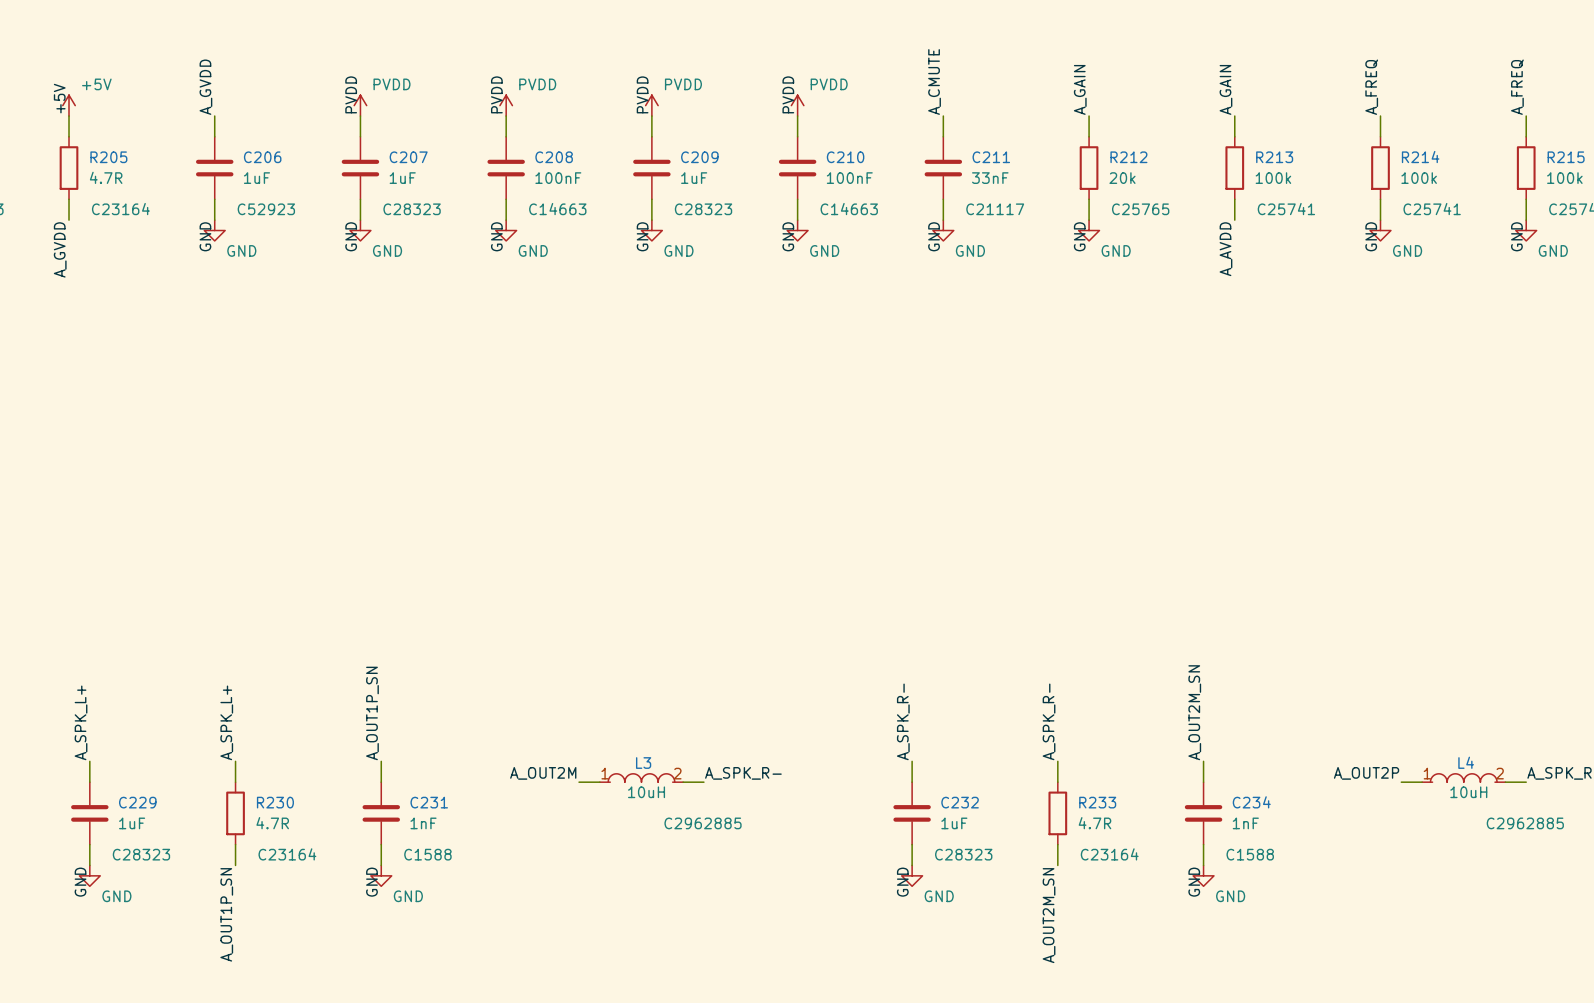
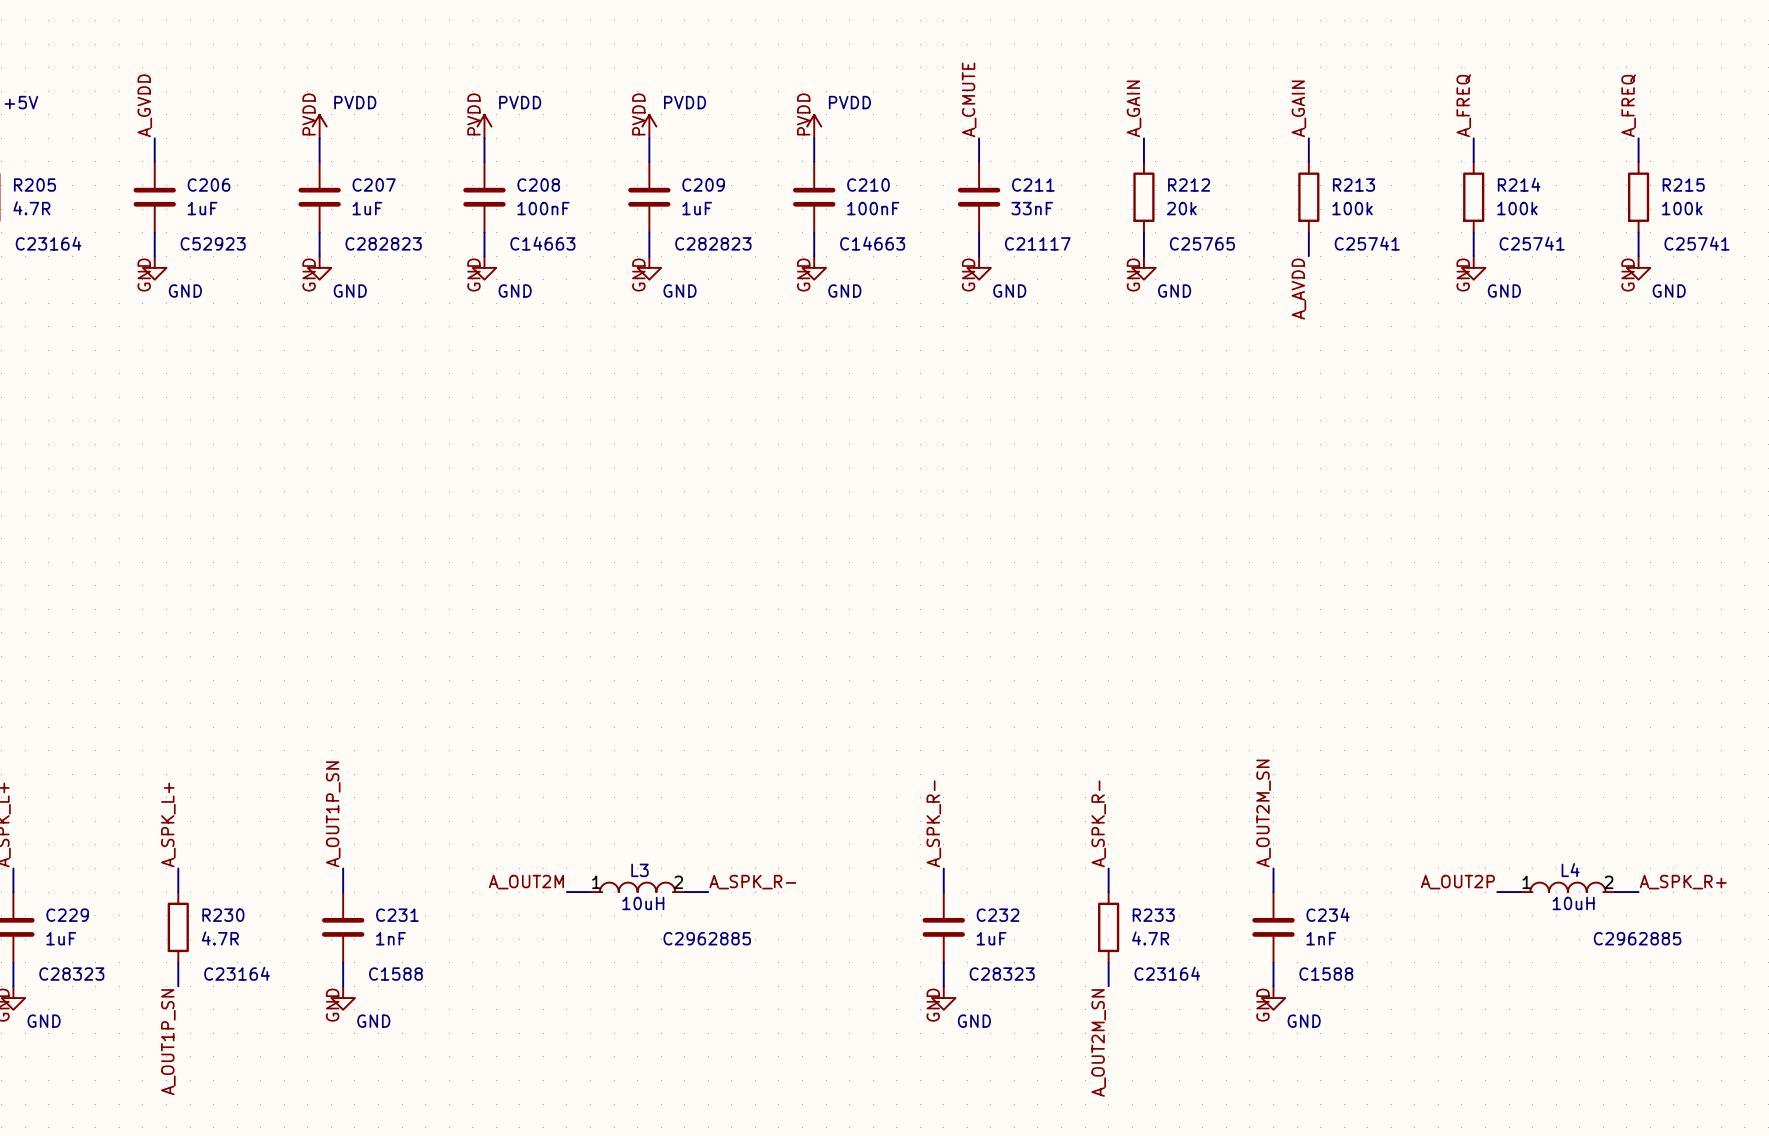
C207 text: C28323 (412, 209) -> C282823 (383, 243)
C209 text: C28323 (703, 209) -> C282823 (713, 243)

